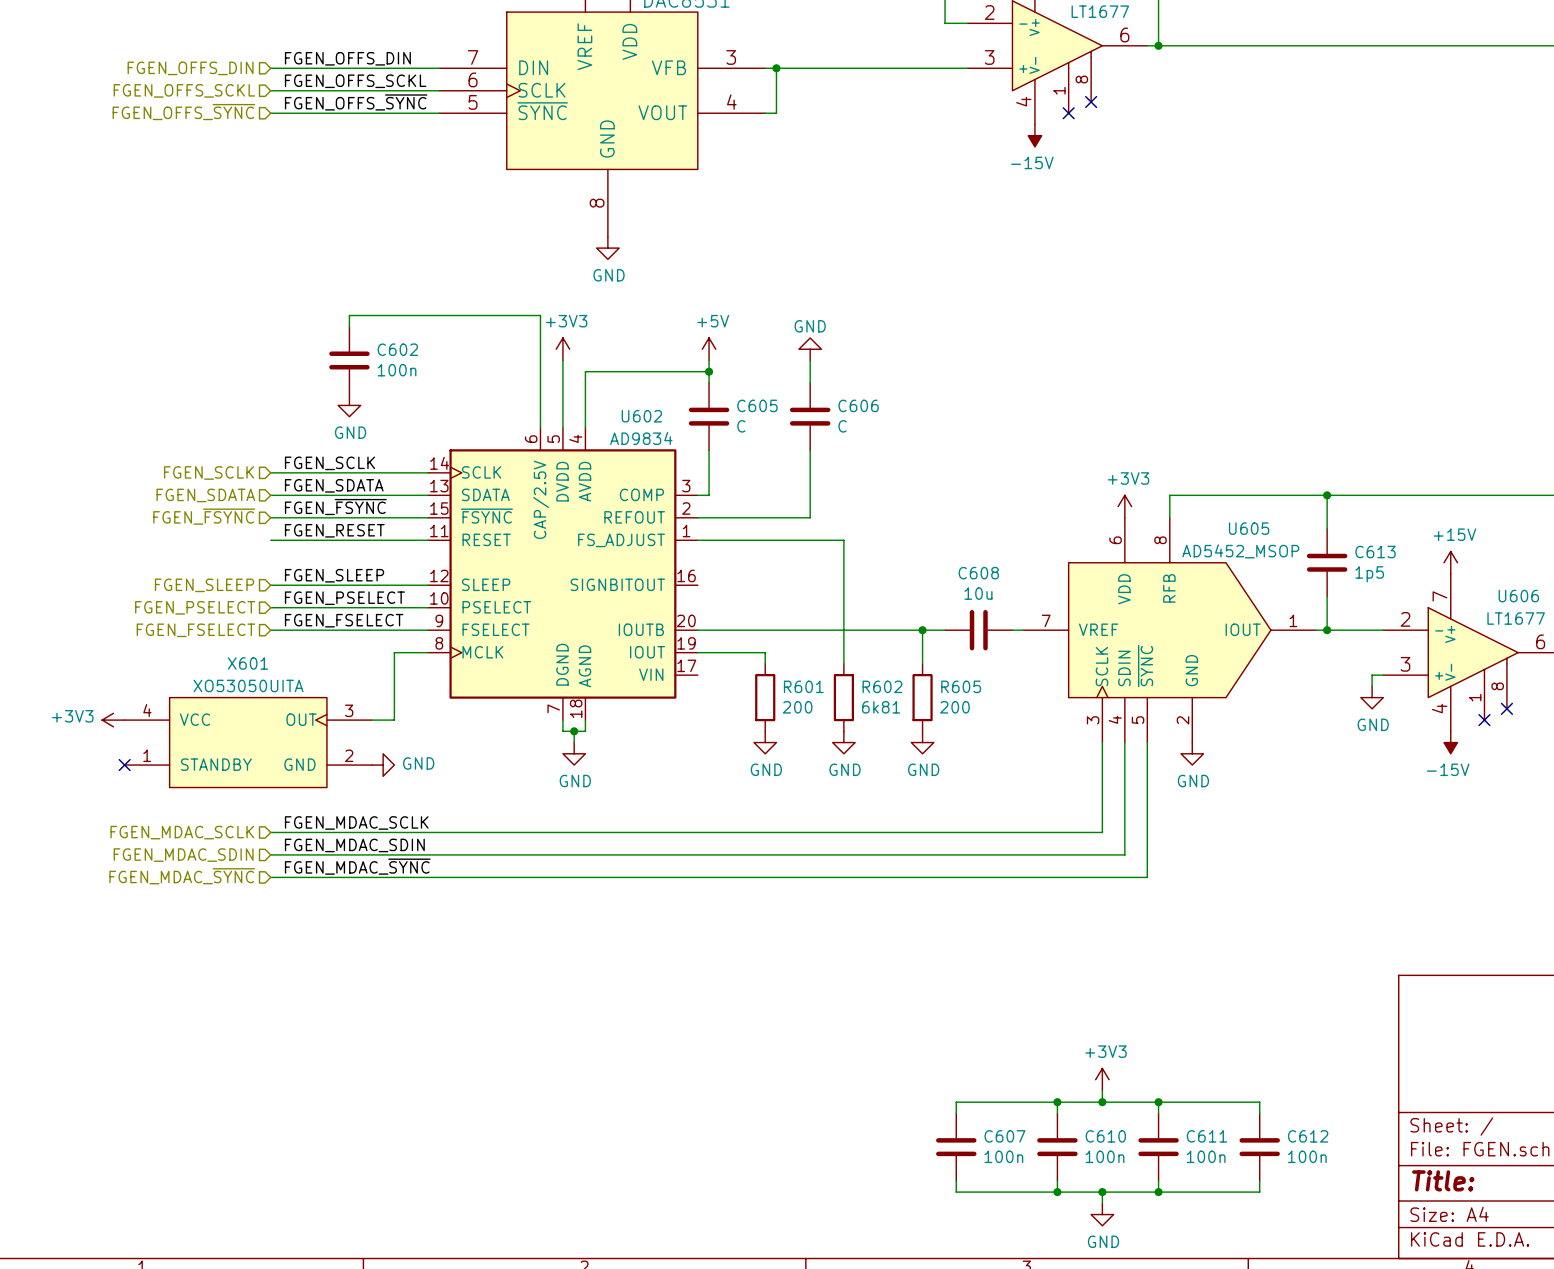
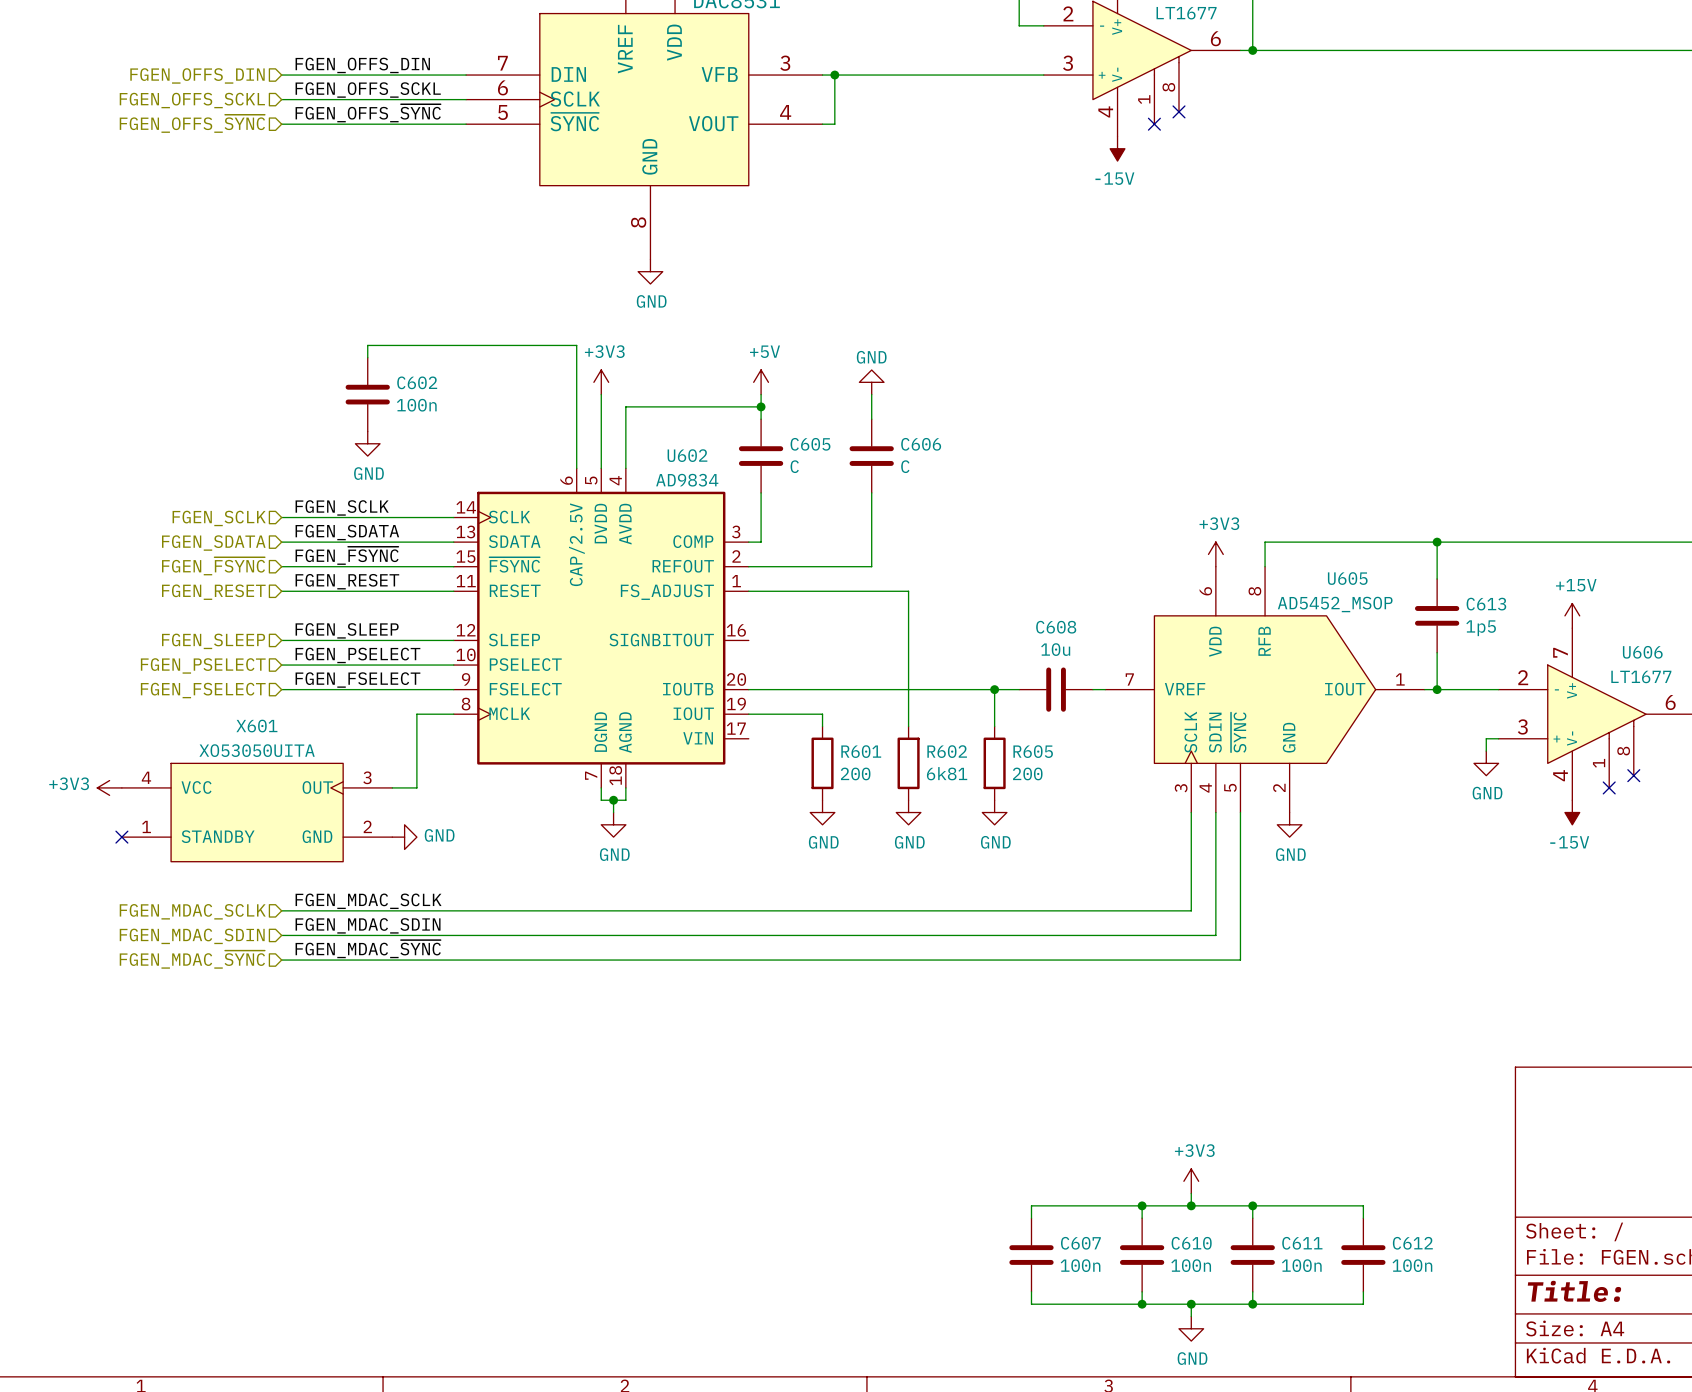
hierarchical label: none -> FGEN_RESET (213, 592)

